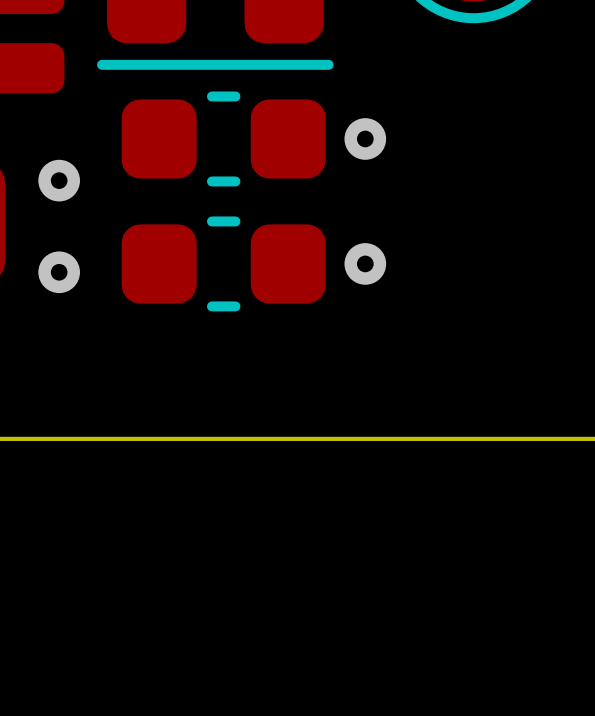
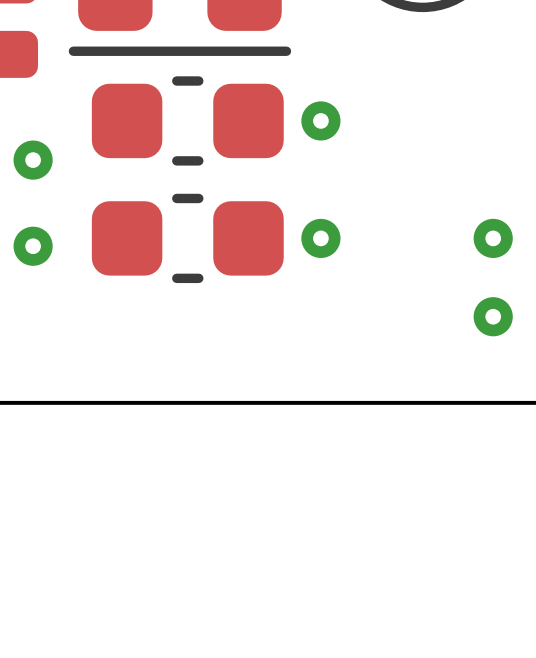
via: none -> (493, 238)
via: none -> (493, 316)

